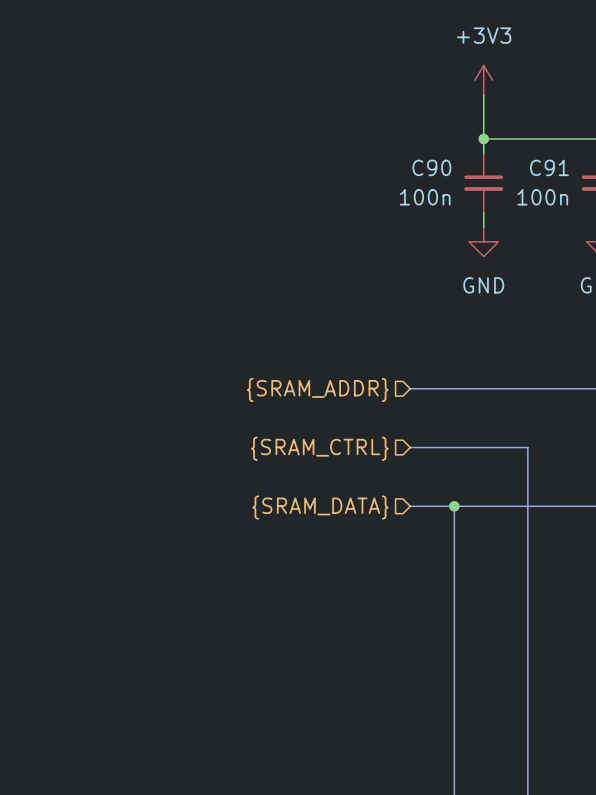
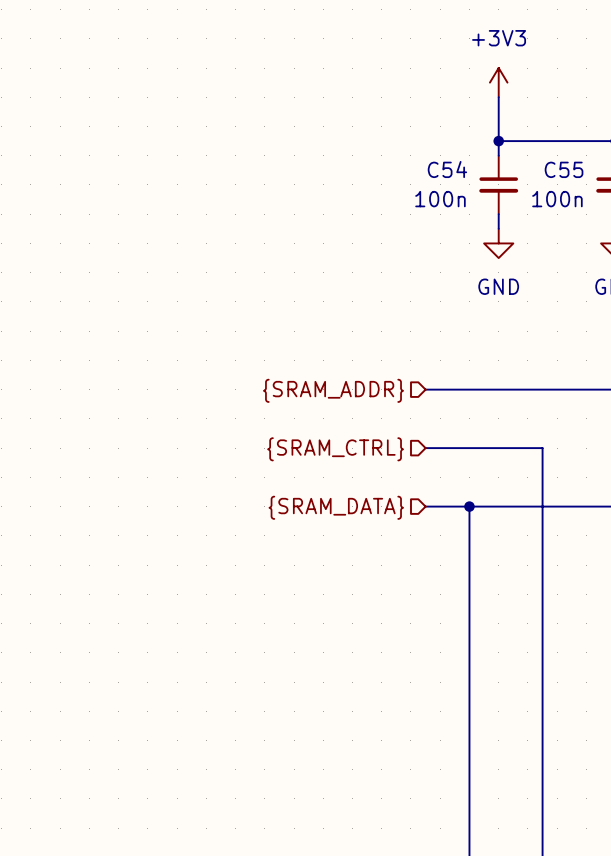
C90 name: C90 (431, 167) -> C54 (447, 169)
C91 name: C91 (549, 167) -> C55 (564, 169)

